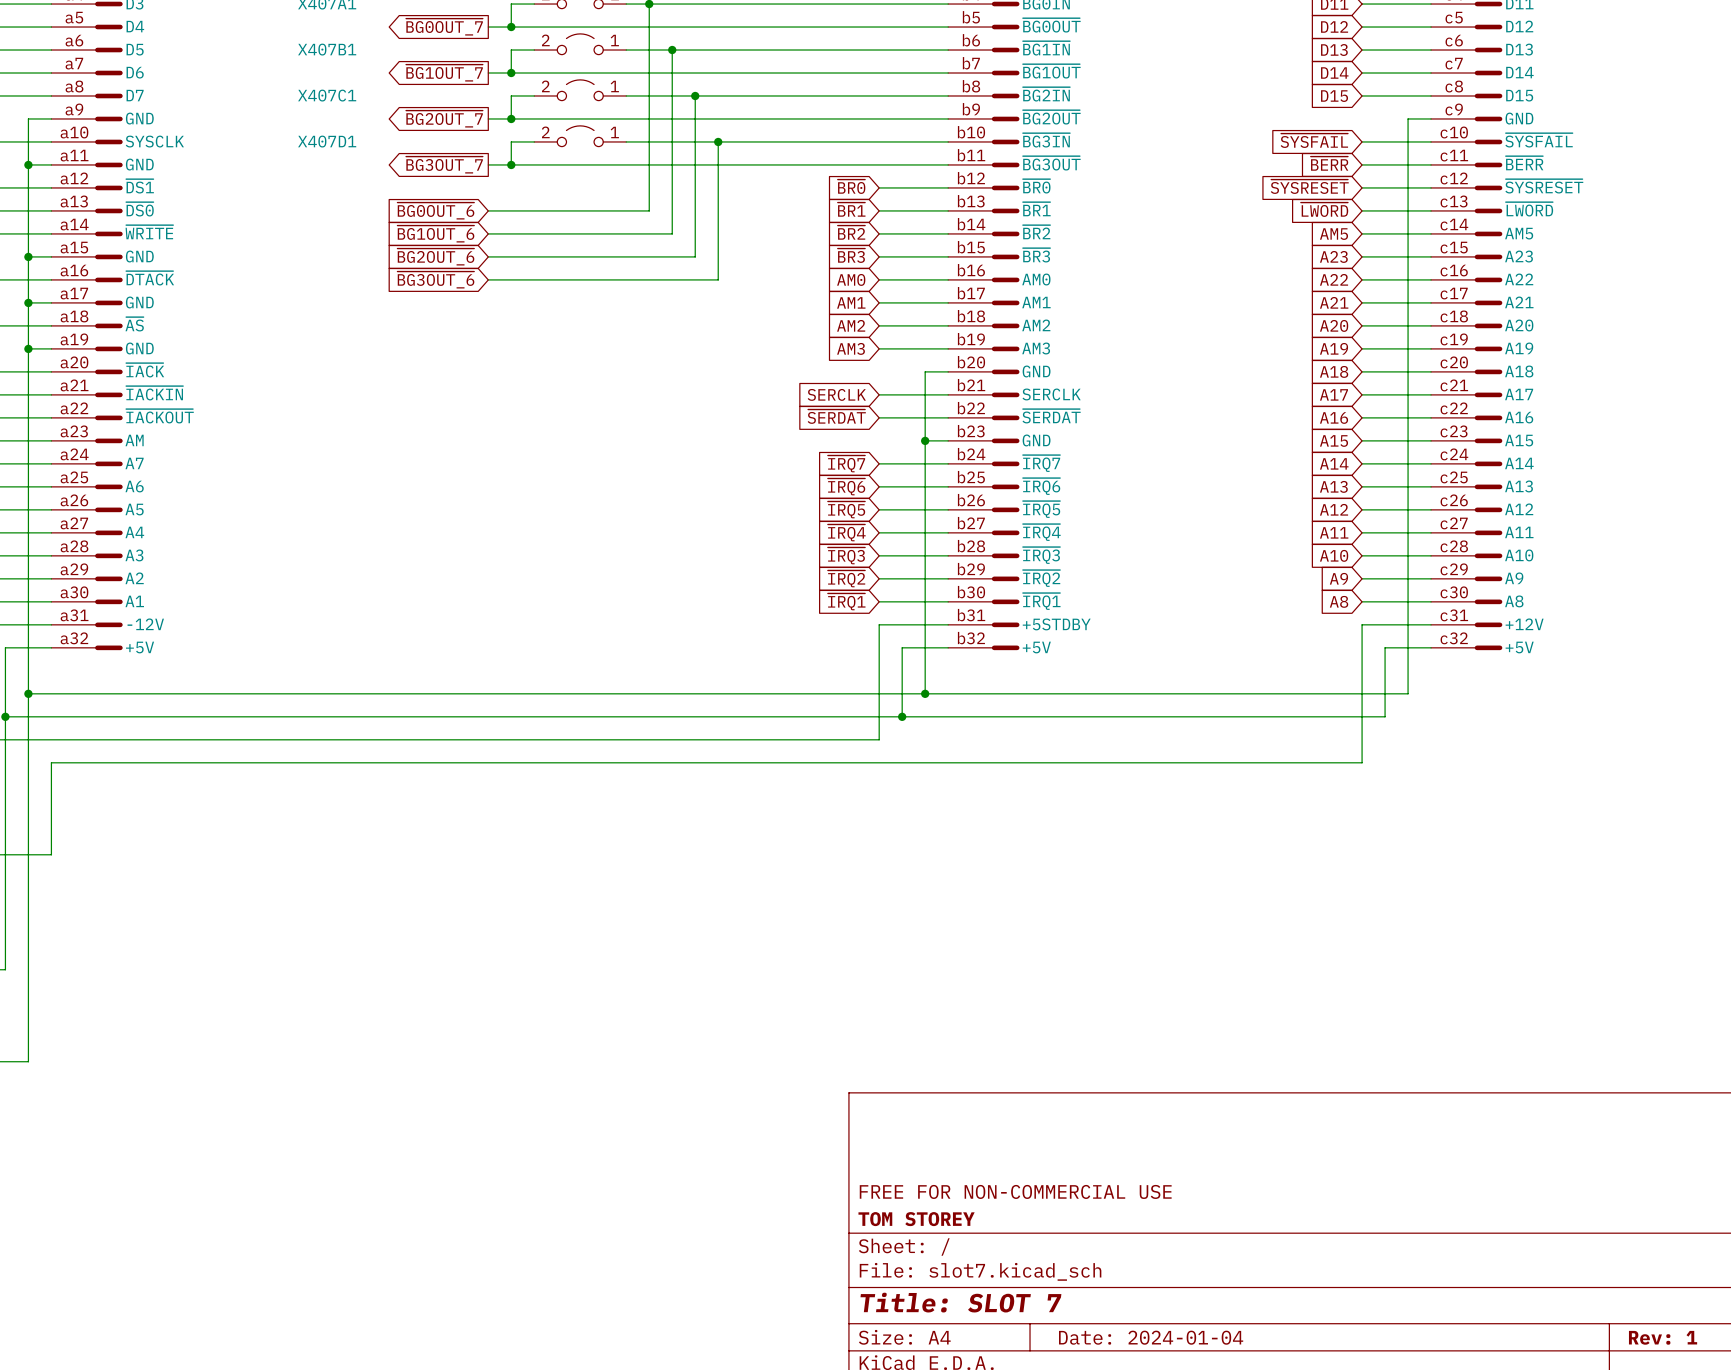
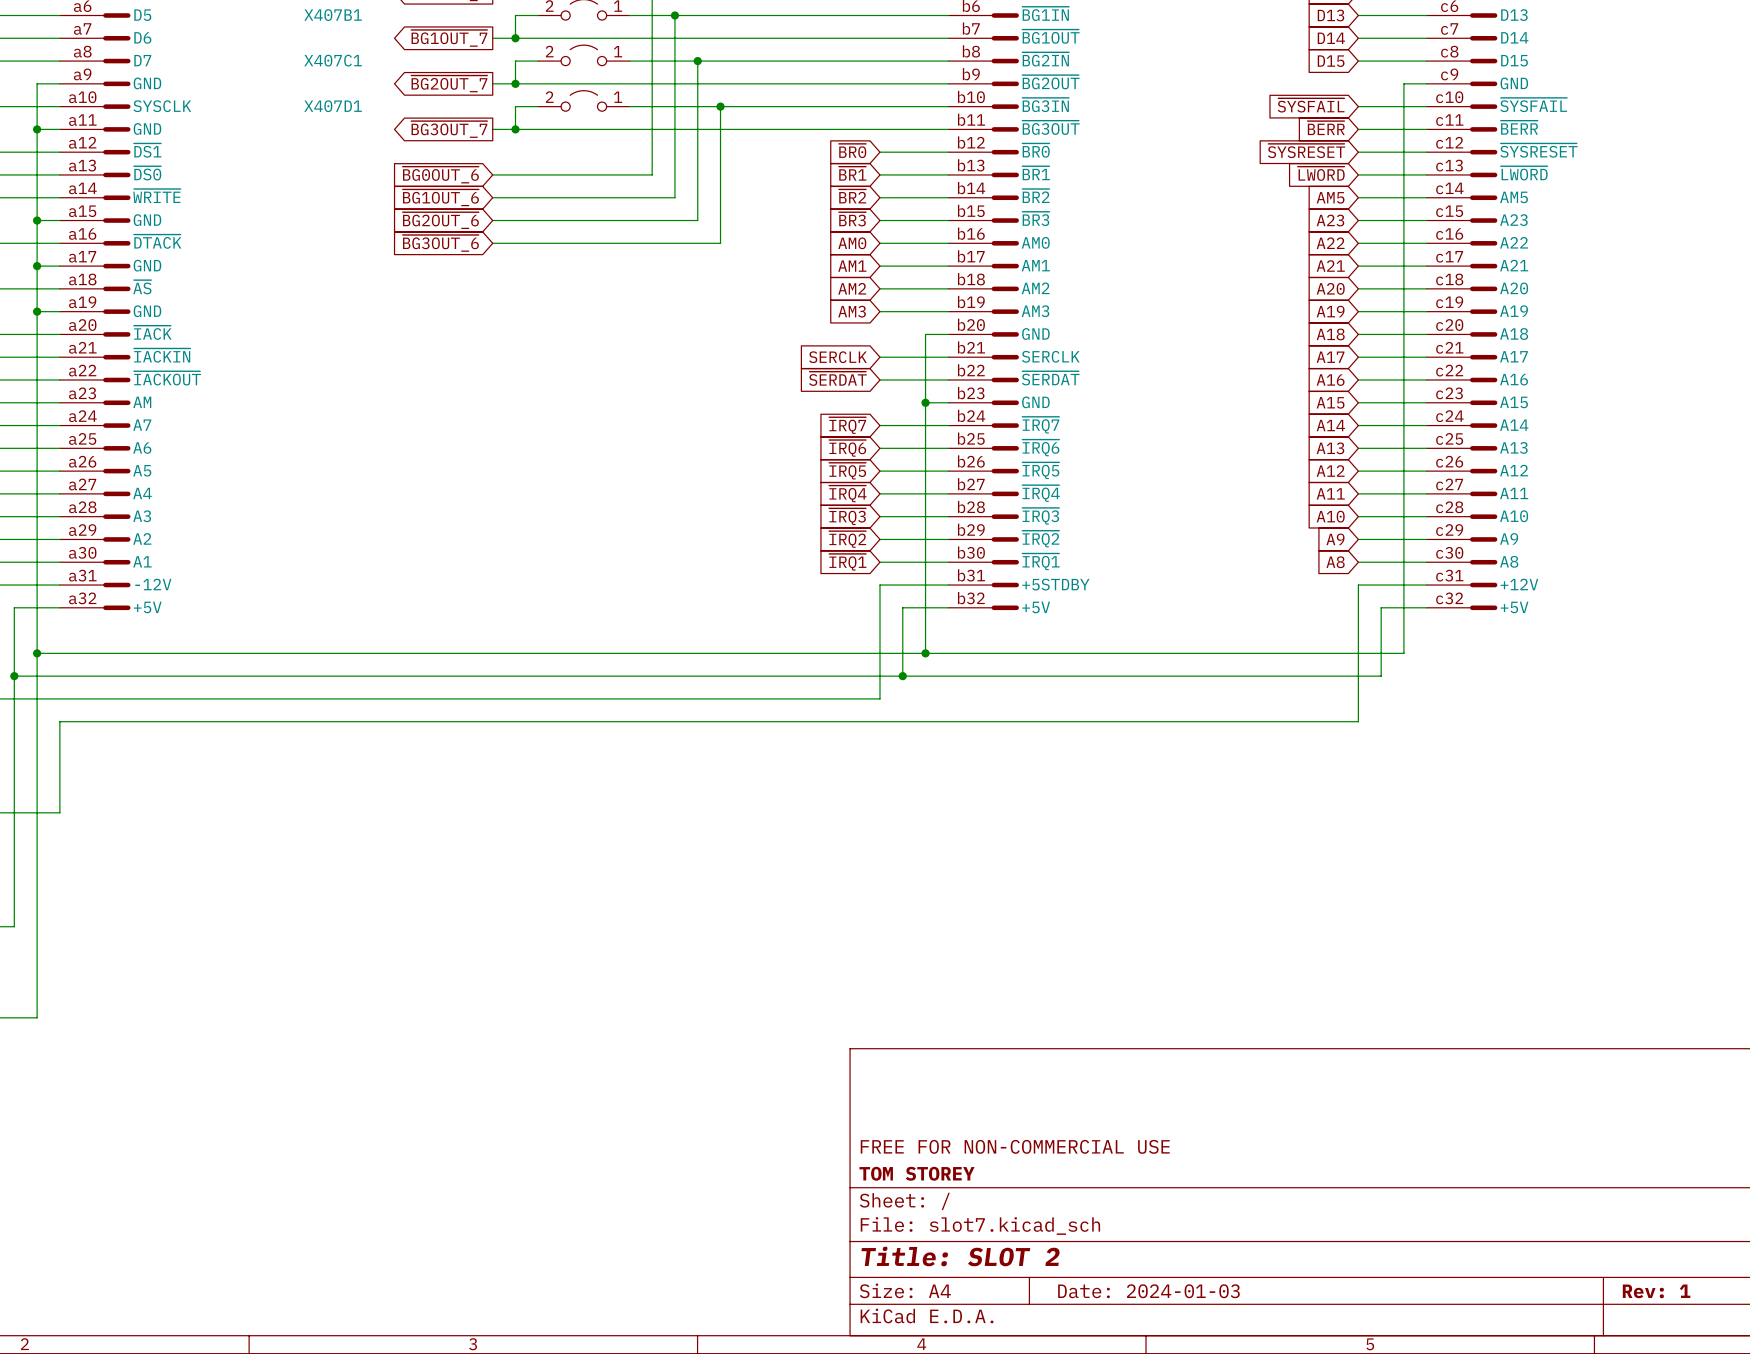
title block: Title: SLOT 7 (960, 1302) -> Title: SLOT 2 (960, 1256)
title block: Date: 2024-01-04 (1151, 1337) -> Date: 2024-01-03 (1148, 1291)

